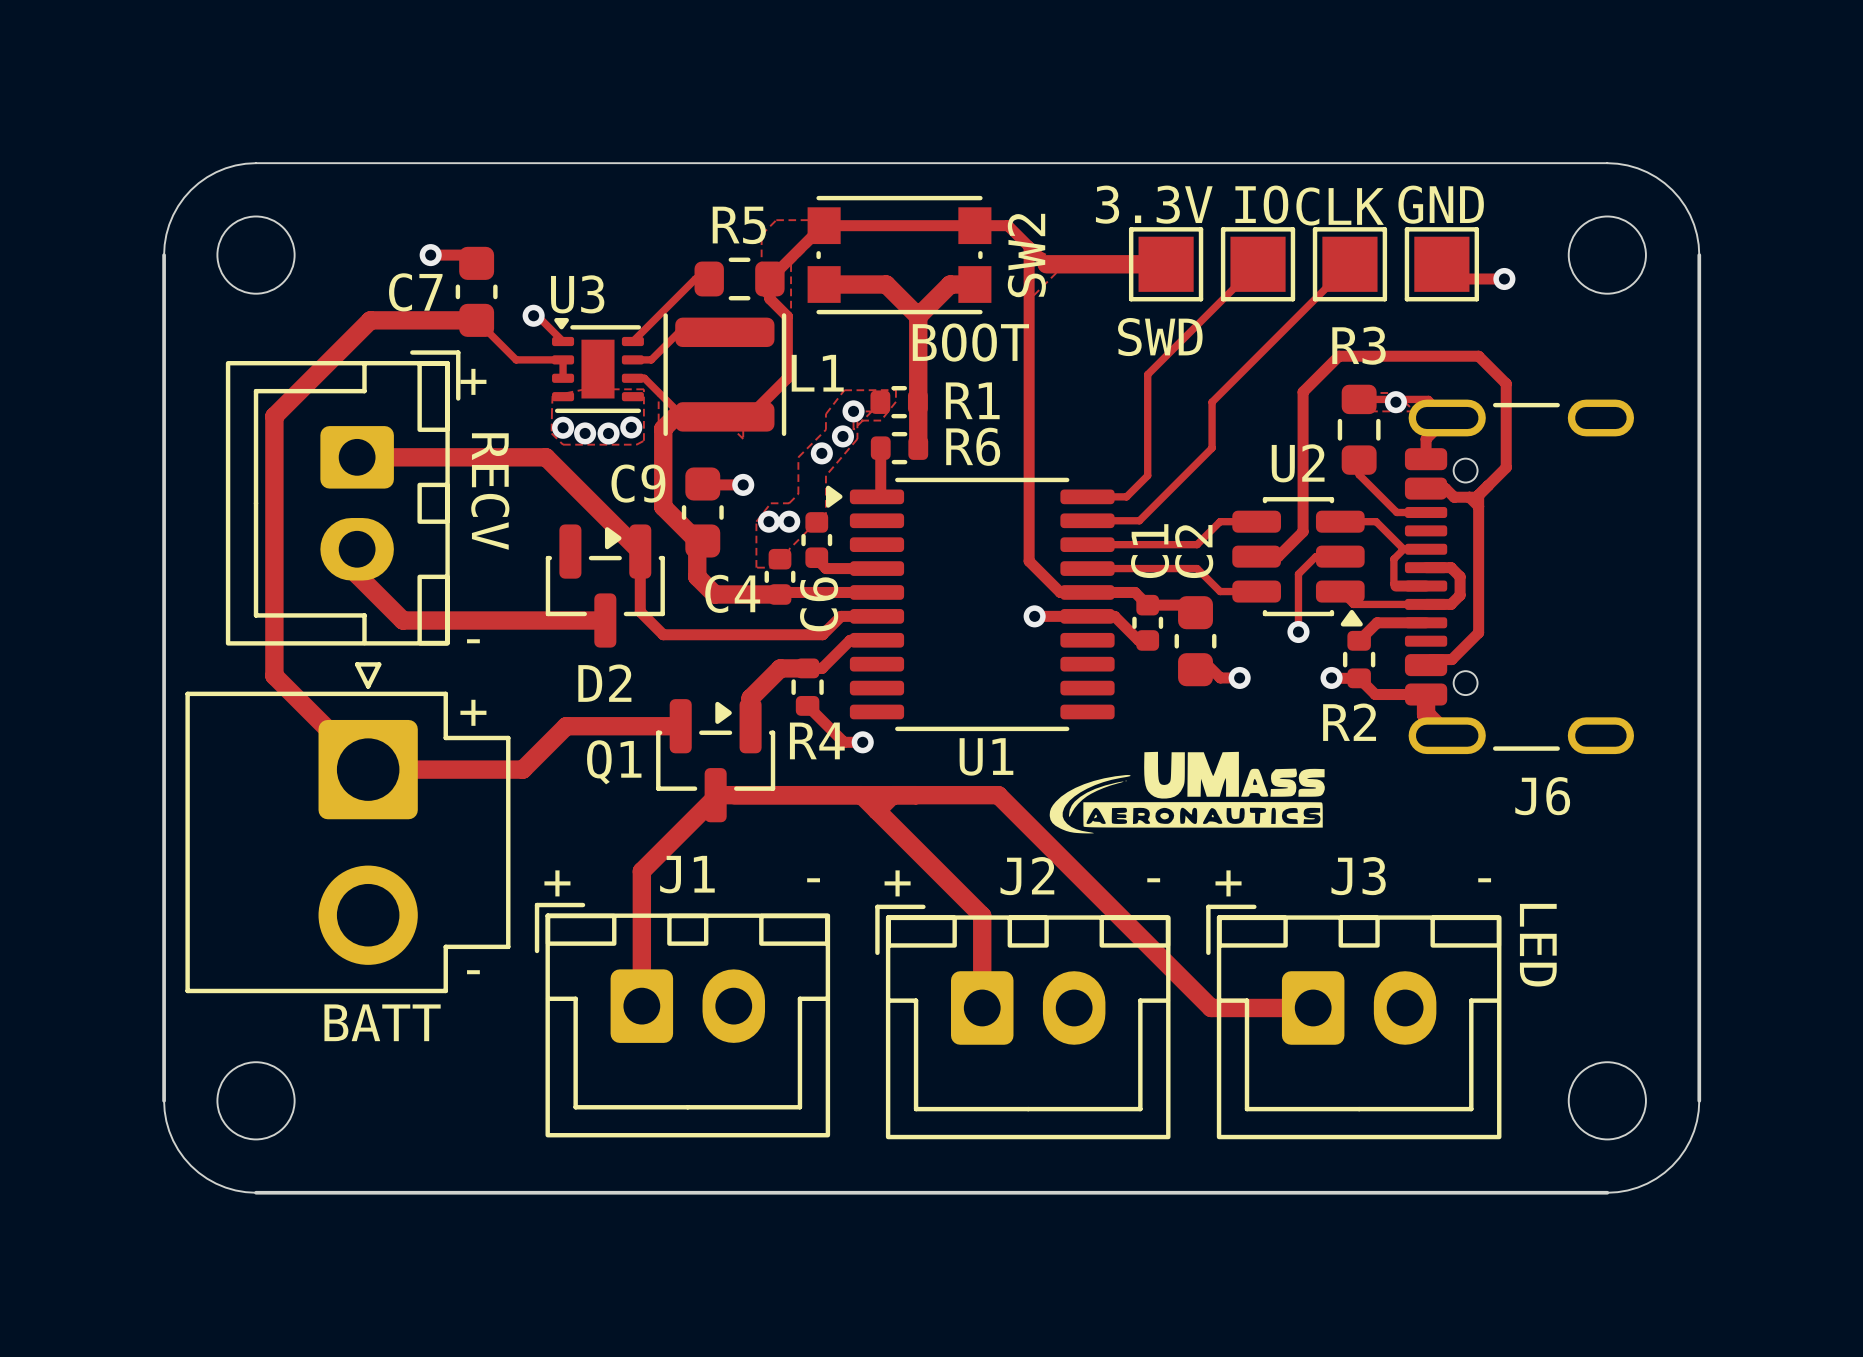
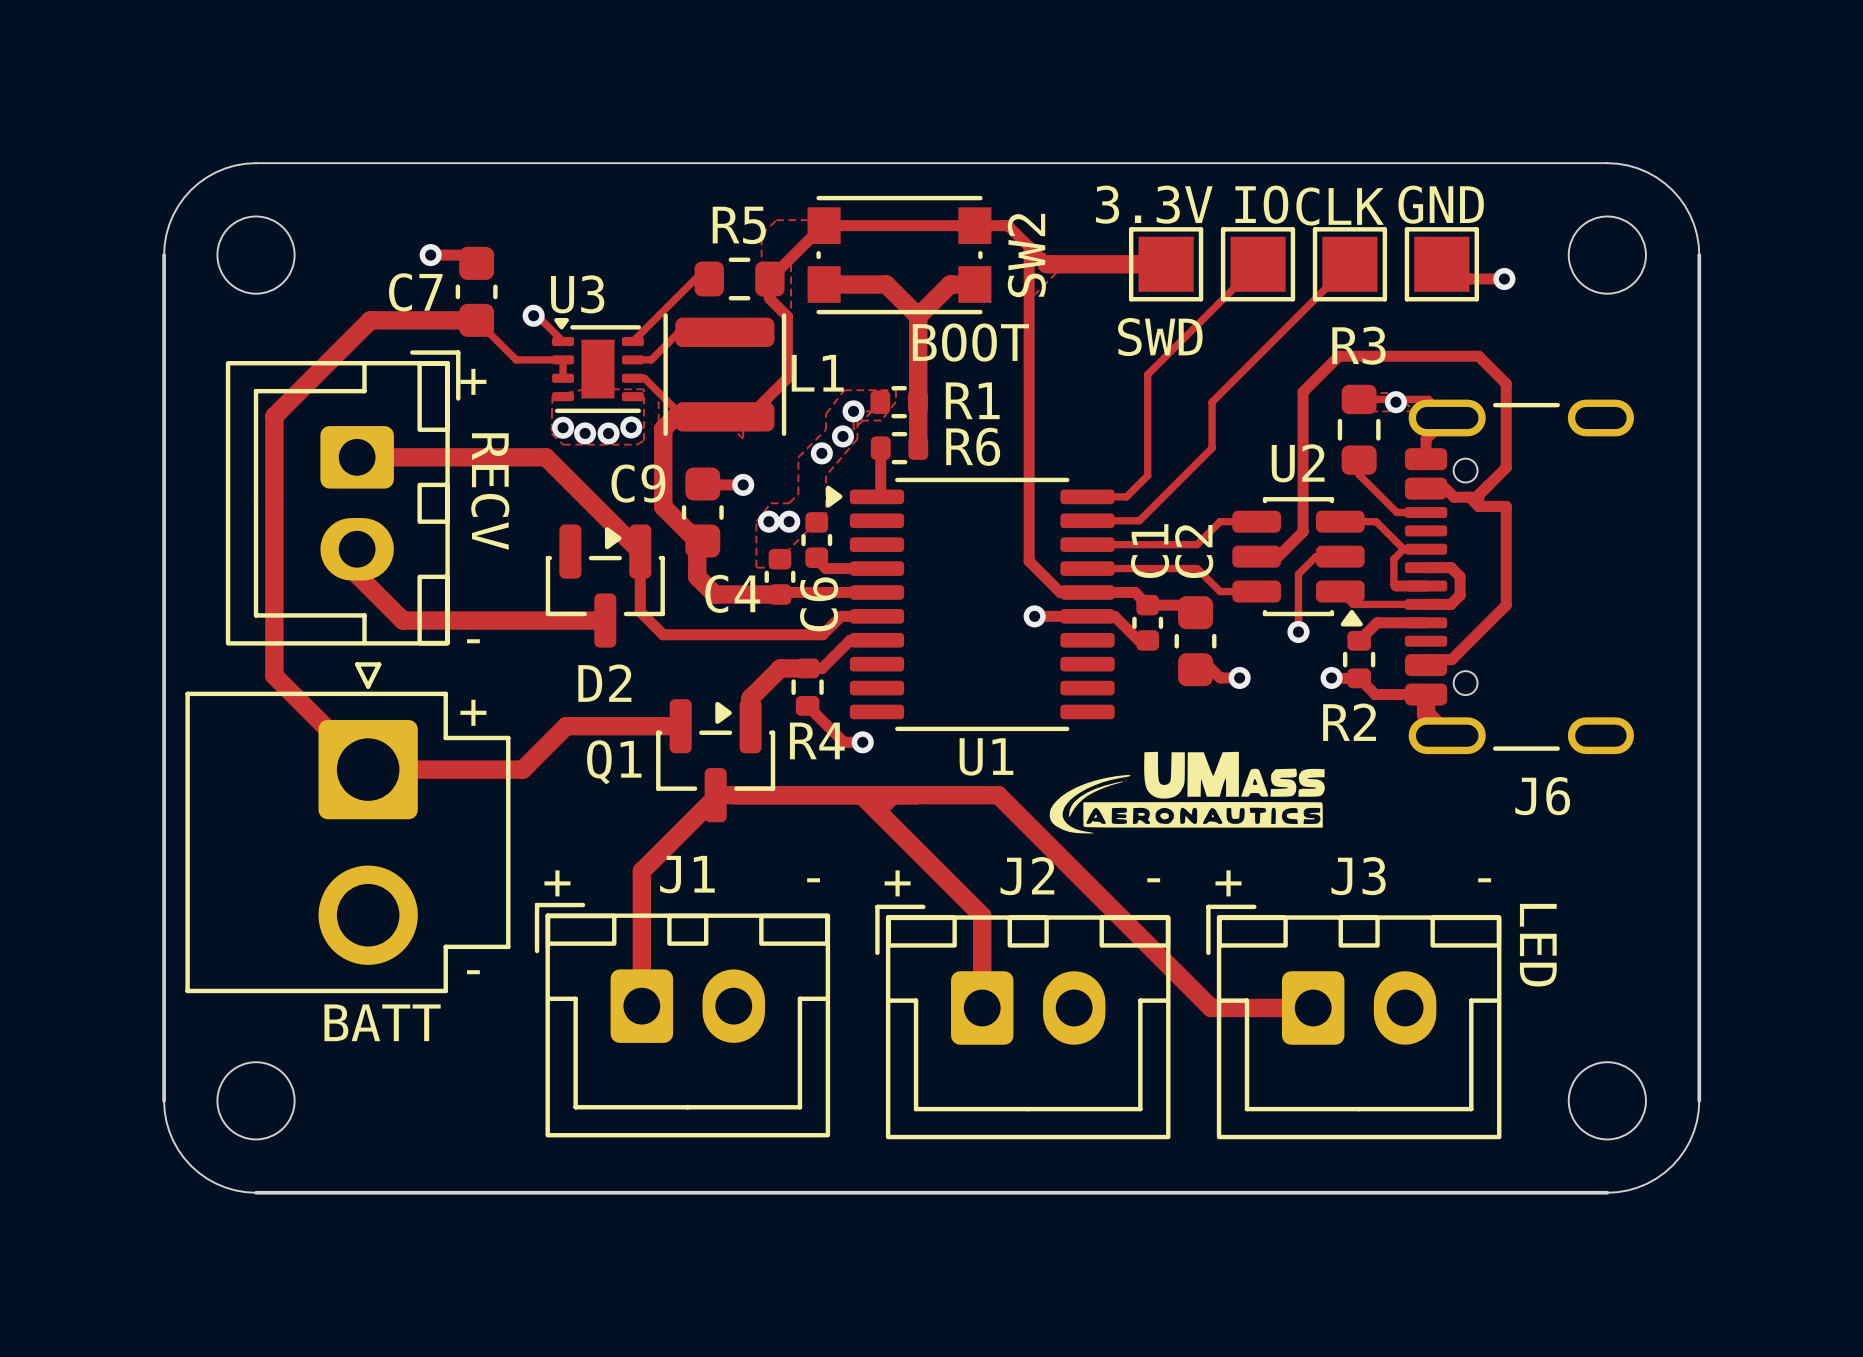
track: (1478, 506) (1478, 632) -> (1478, 506) (1506, 506) (1506, 605) (1478, 632)

